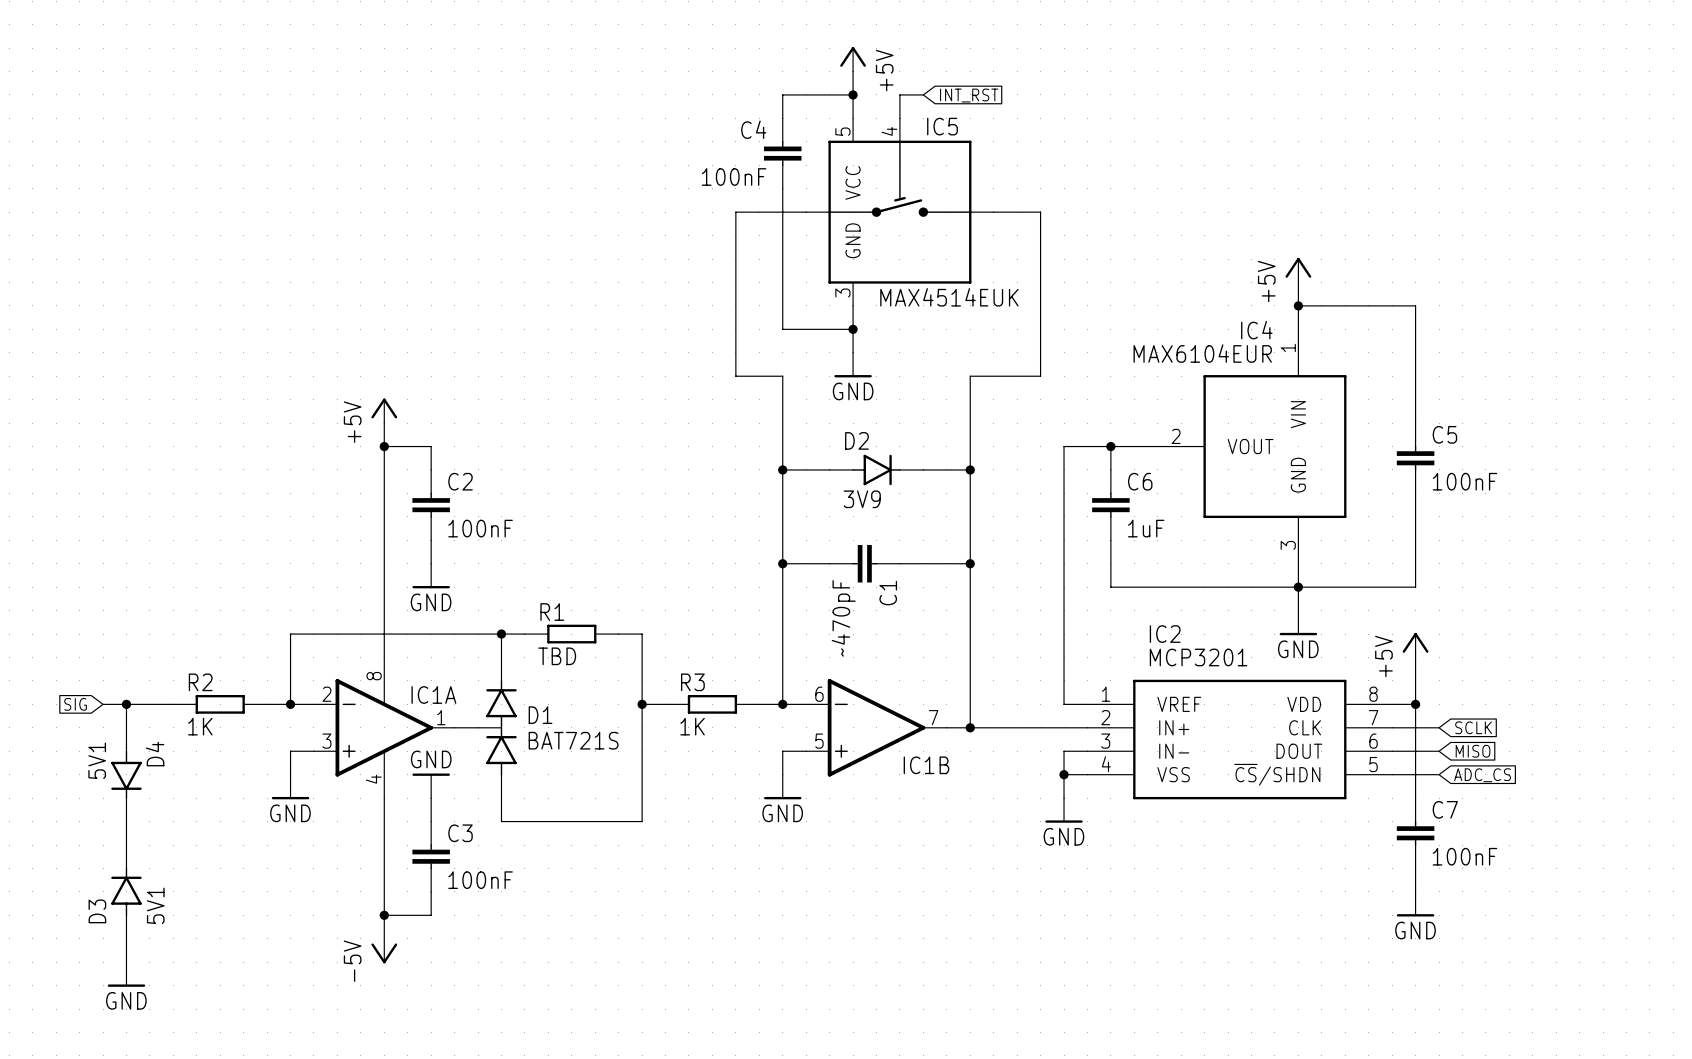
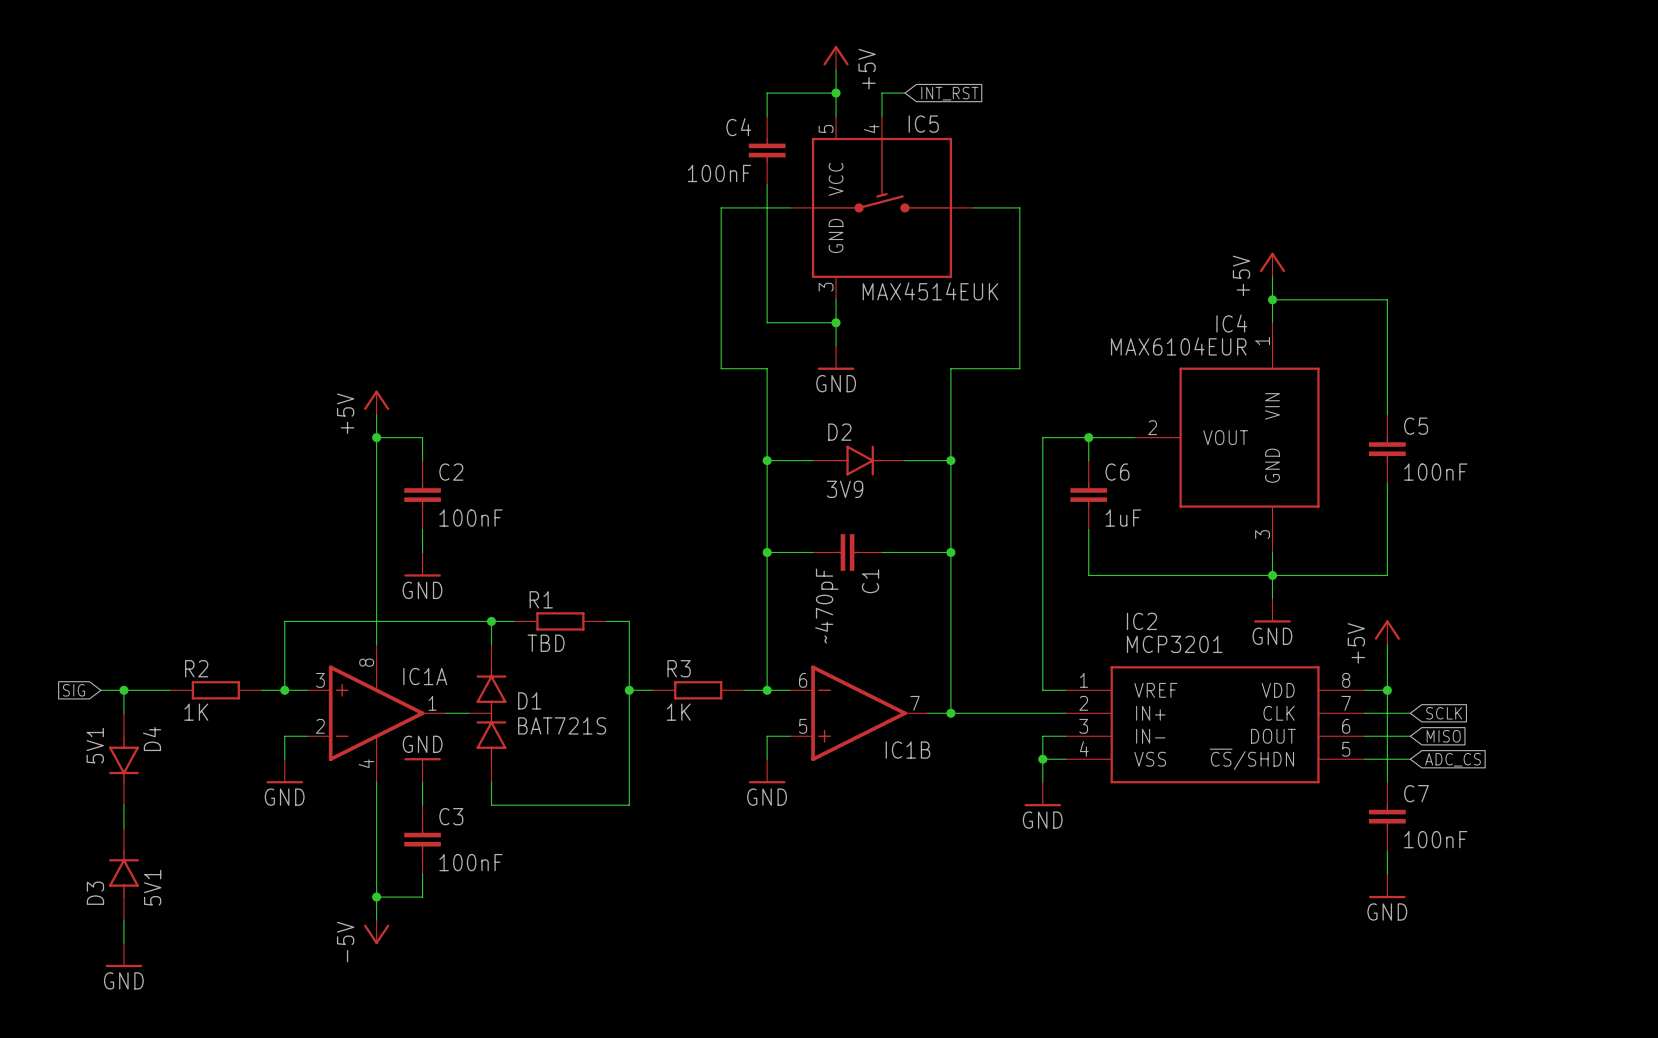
IC1A flip: as is (384, 727) -> up-down (376, 713)

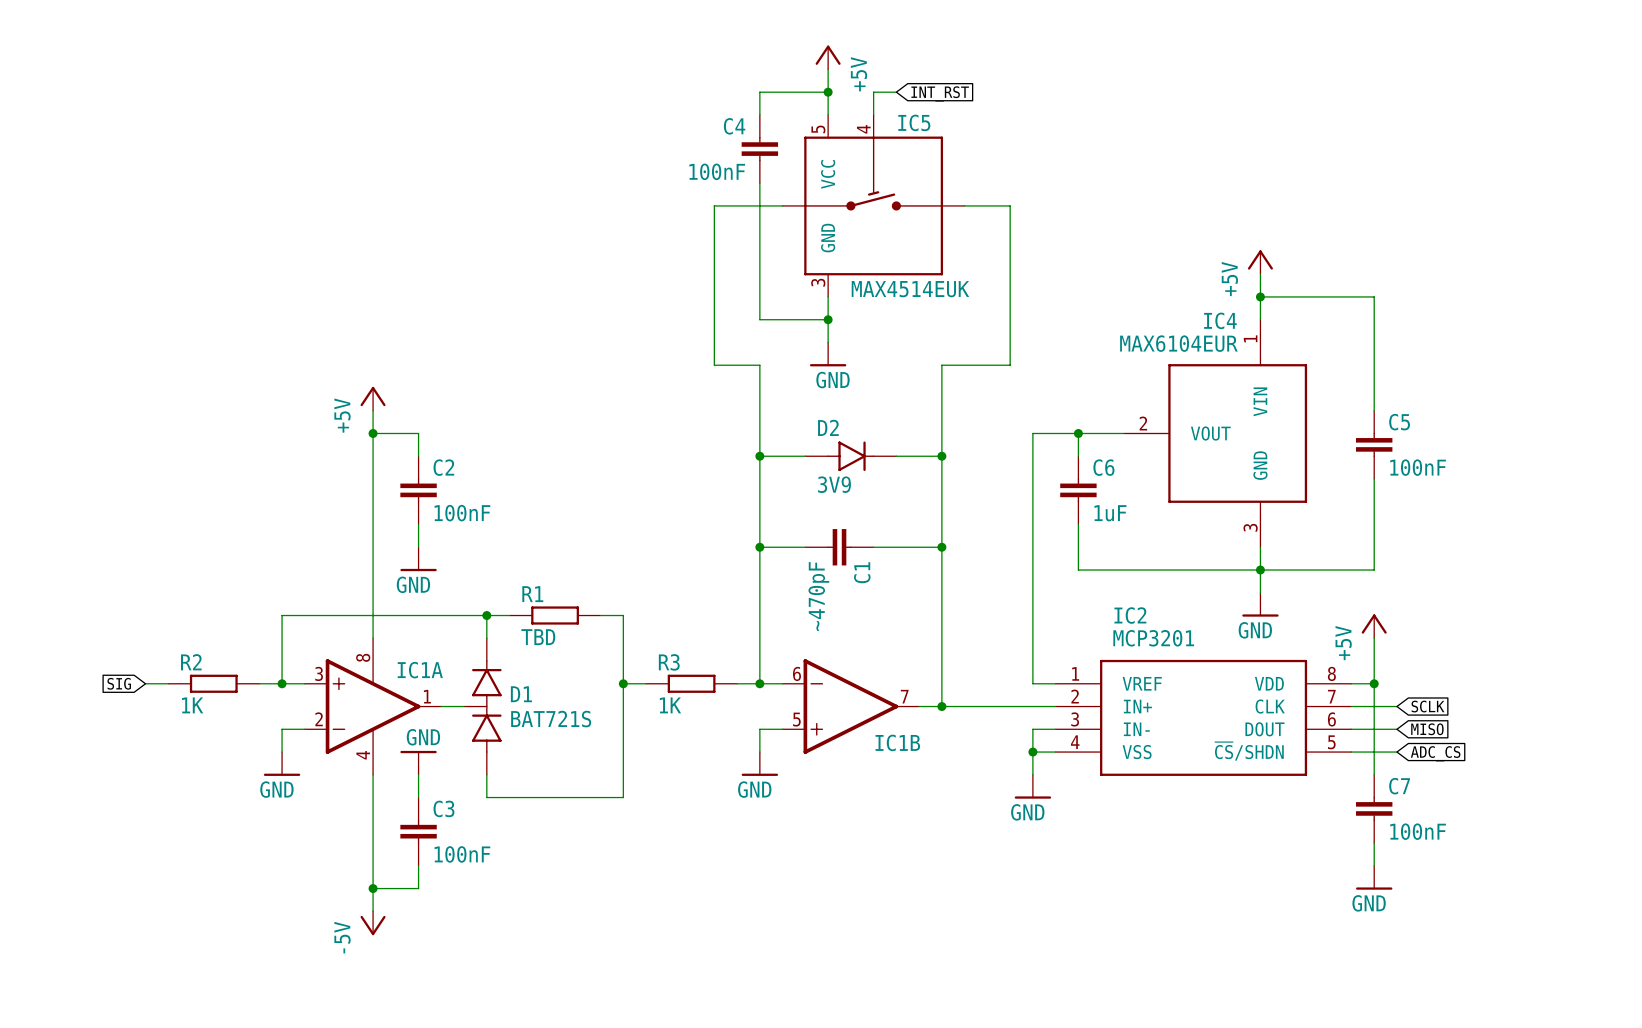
global label position: SIG (74, 690) -> SIG (119, 683)
wire: (100, 690) (146, 690) -> none
wire: (123, 690) (123, 713) -> none
junction: (123, 690) -> none
D4: 5V1 (123, 759) -> none
wire: (123, 805) (123, 828) -> none
D3: 5V1 (123, 874) -> none
wire: (123, 920) (123, 943) -> none
power symbol: GND (123, 955) -> none

